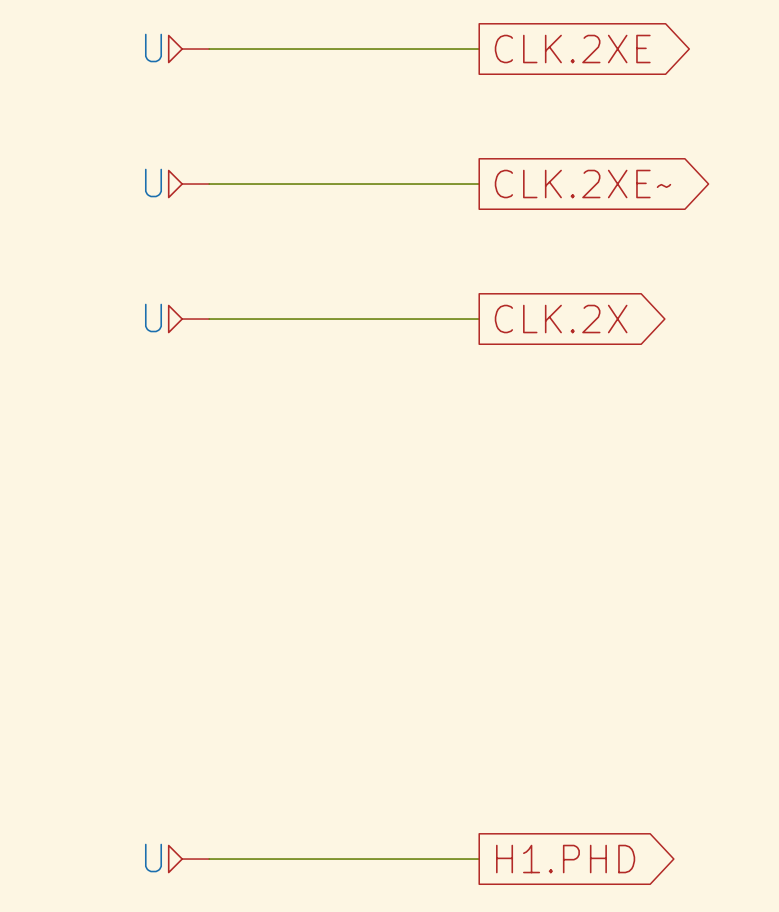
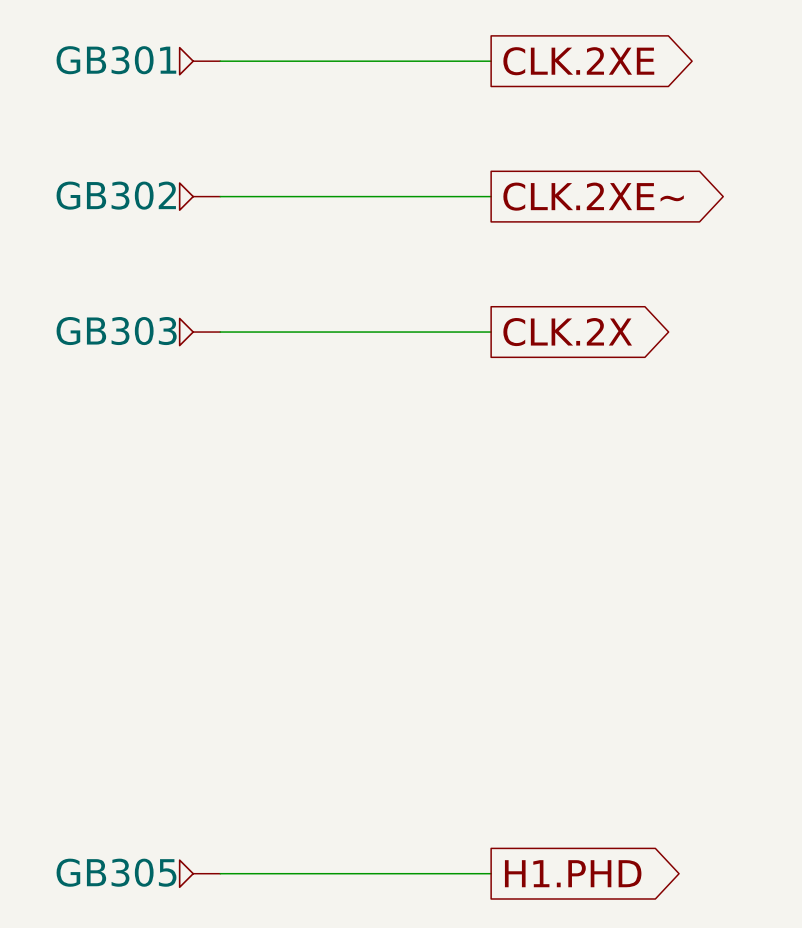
U name: U (153, 48) -> GB301 (116, 60)
U name: U (153, 183) -> GB302 (116, 195)
U name: U (153, 318) -> GB303 (116, 331)
U name: U (153, 858) -> GB305 (116, 872)

